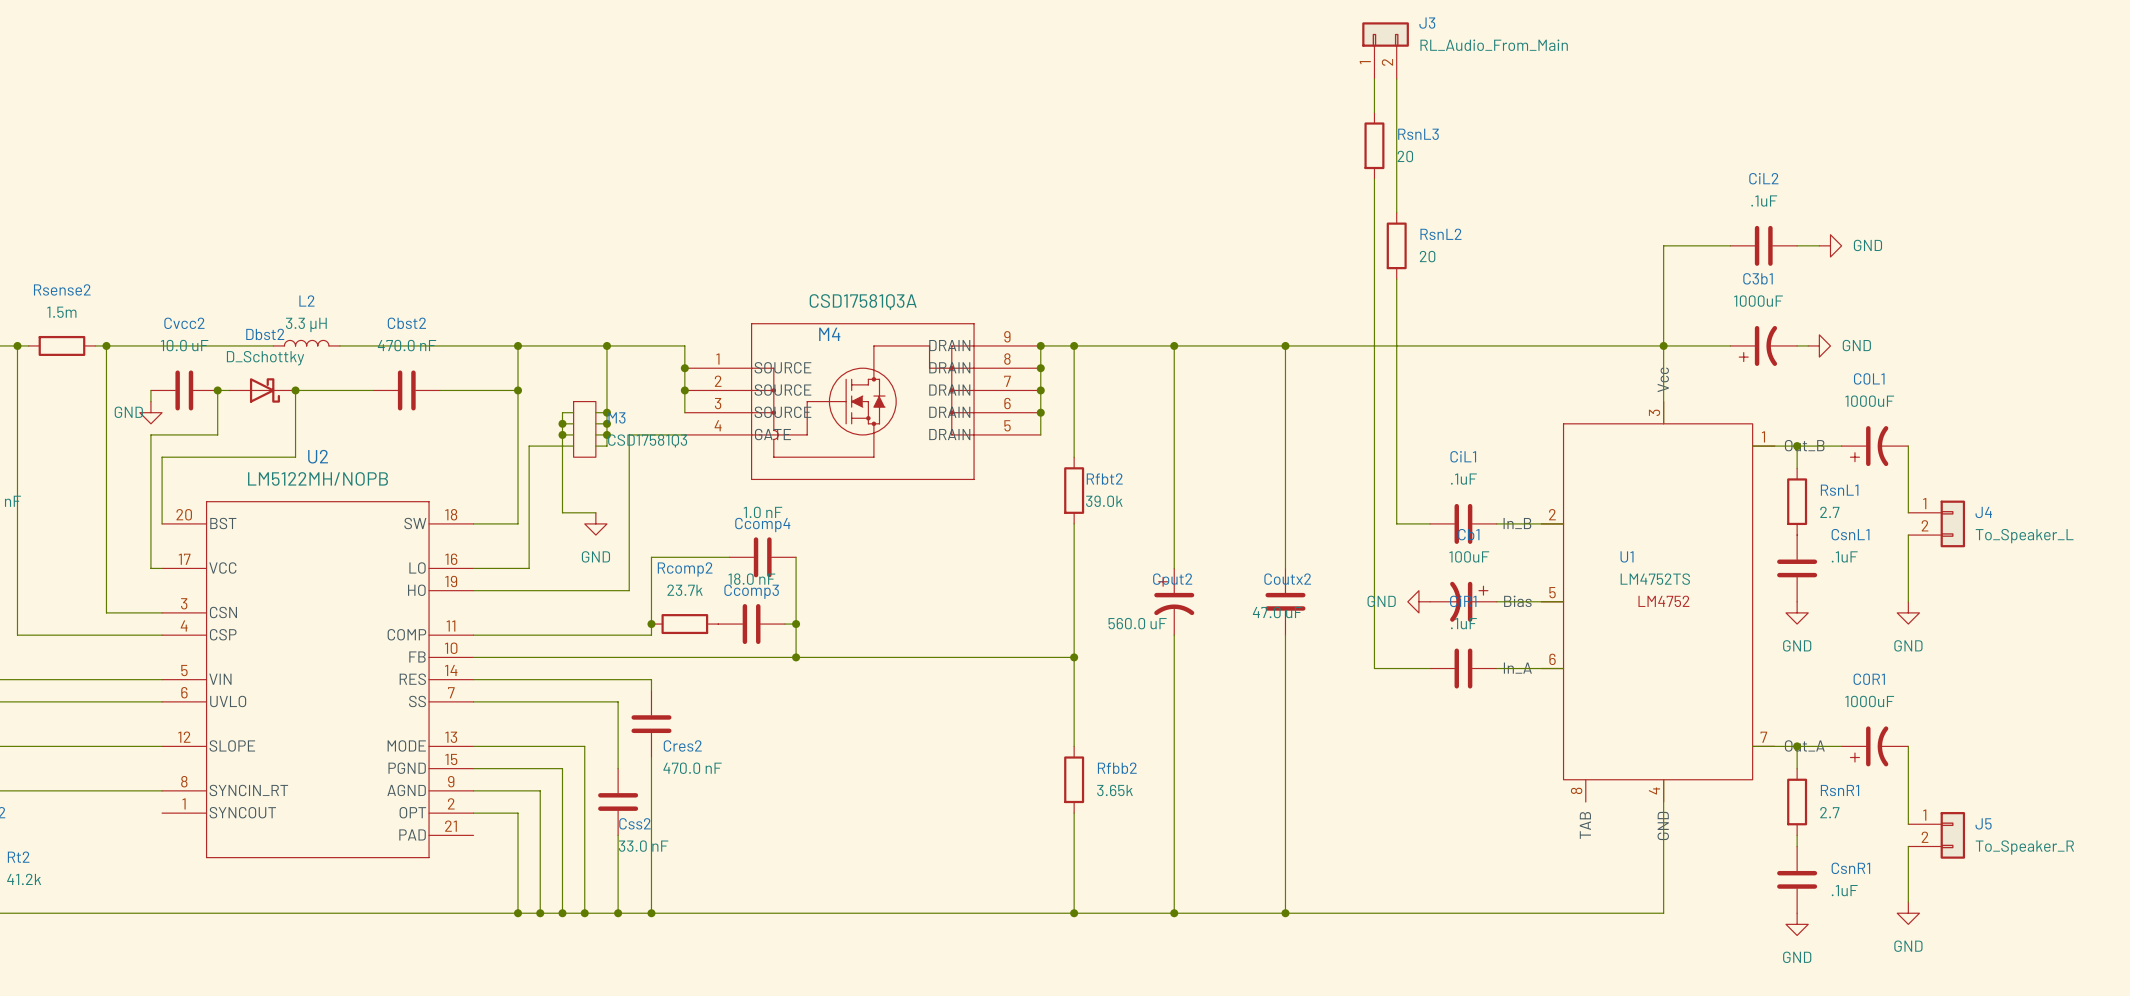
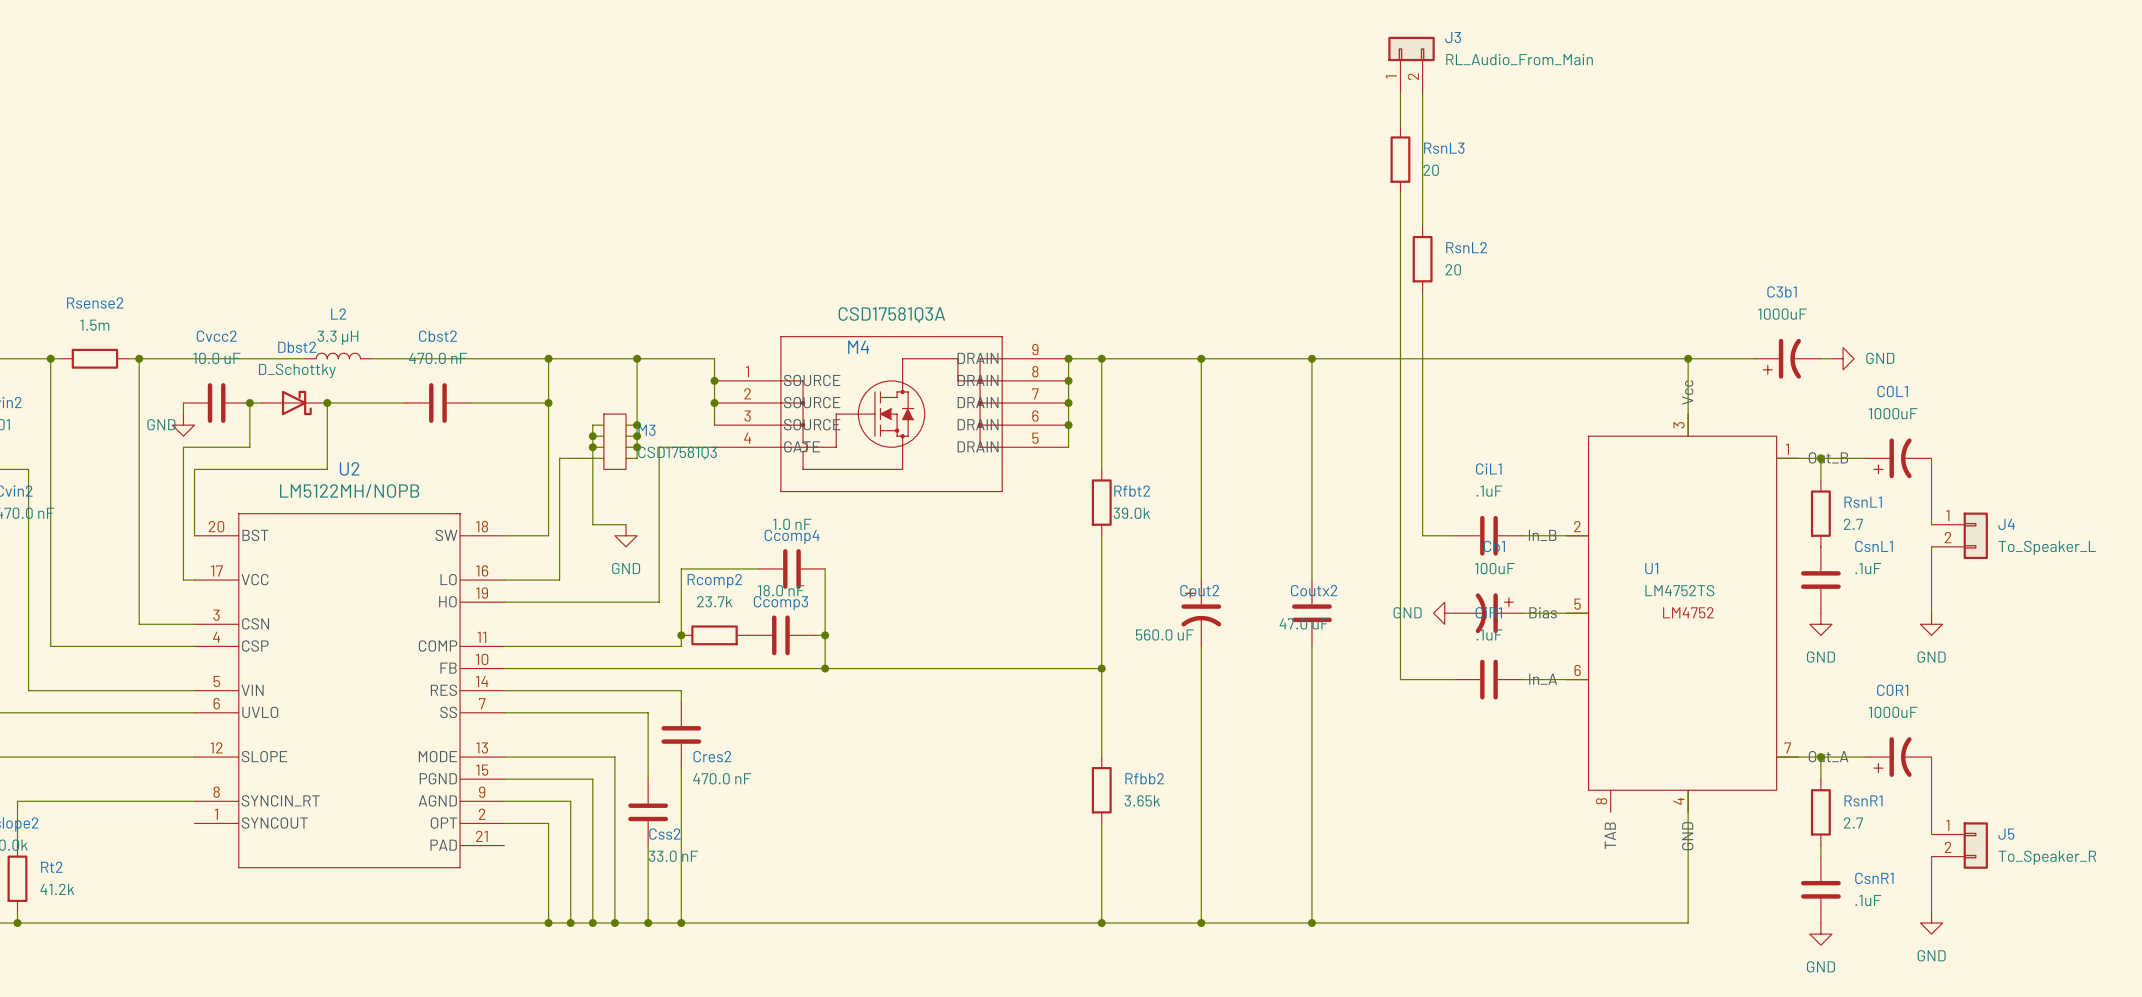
wire: (1730, 245) (1663, 245) (1663, 345) -> none
CiL2: .1uF (1763, 245) -> none
wire: (1797, 245) (1819, 245) -> none
power symbol: GND (1830, 245) -> none

